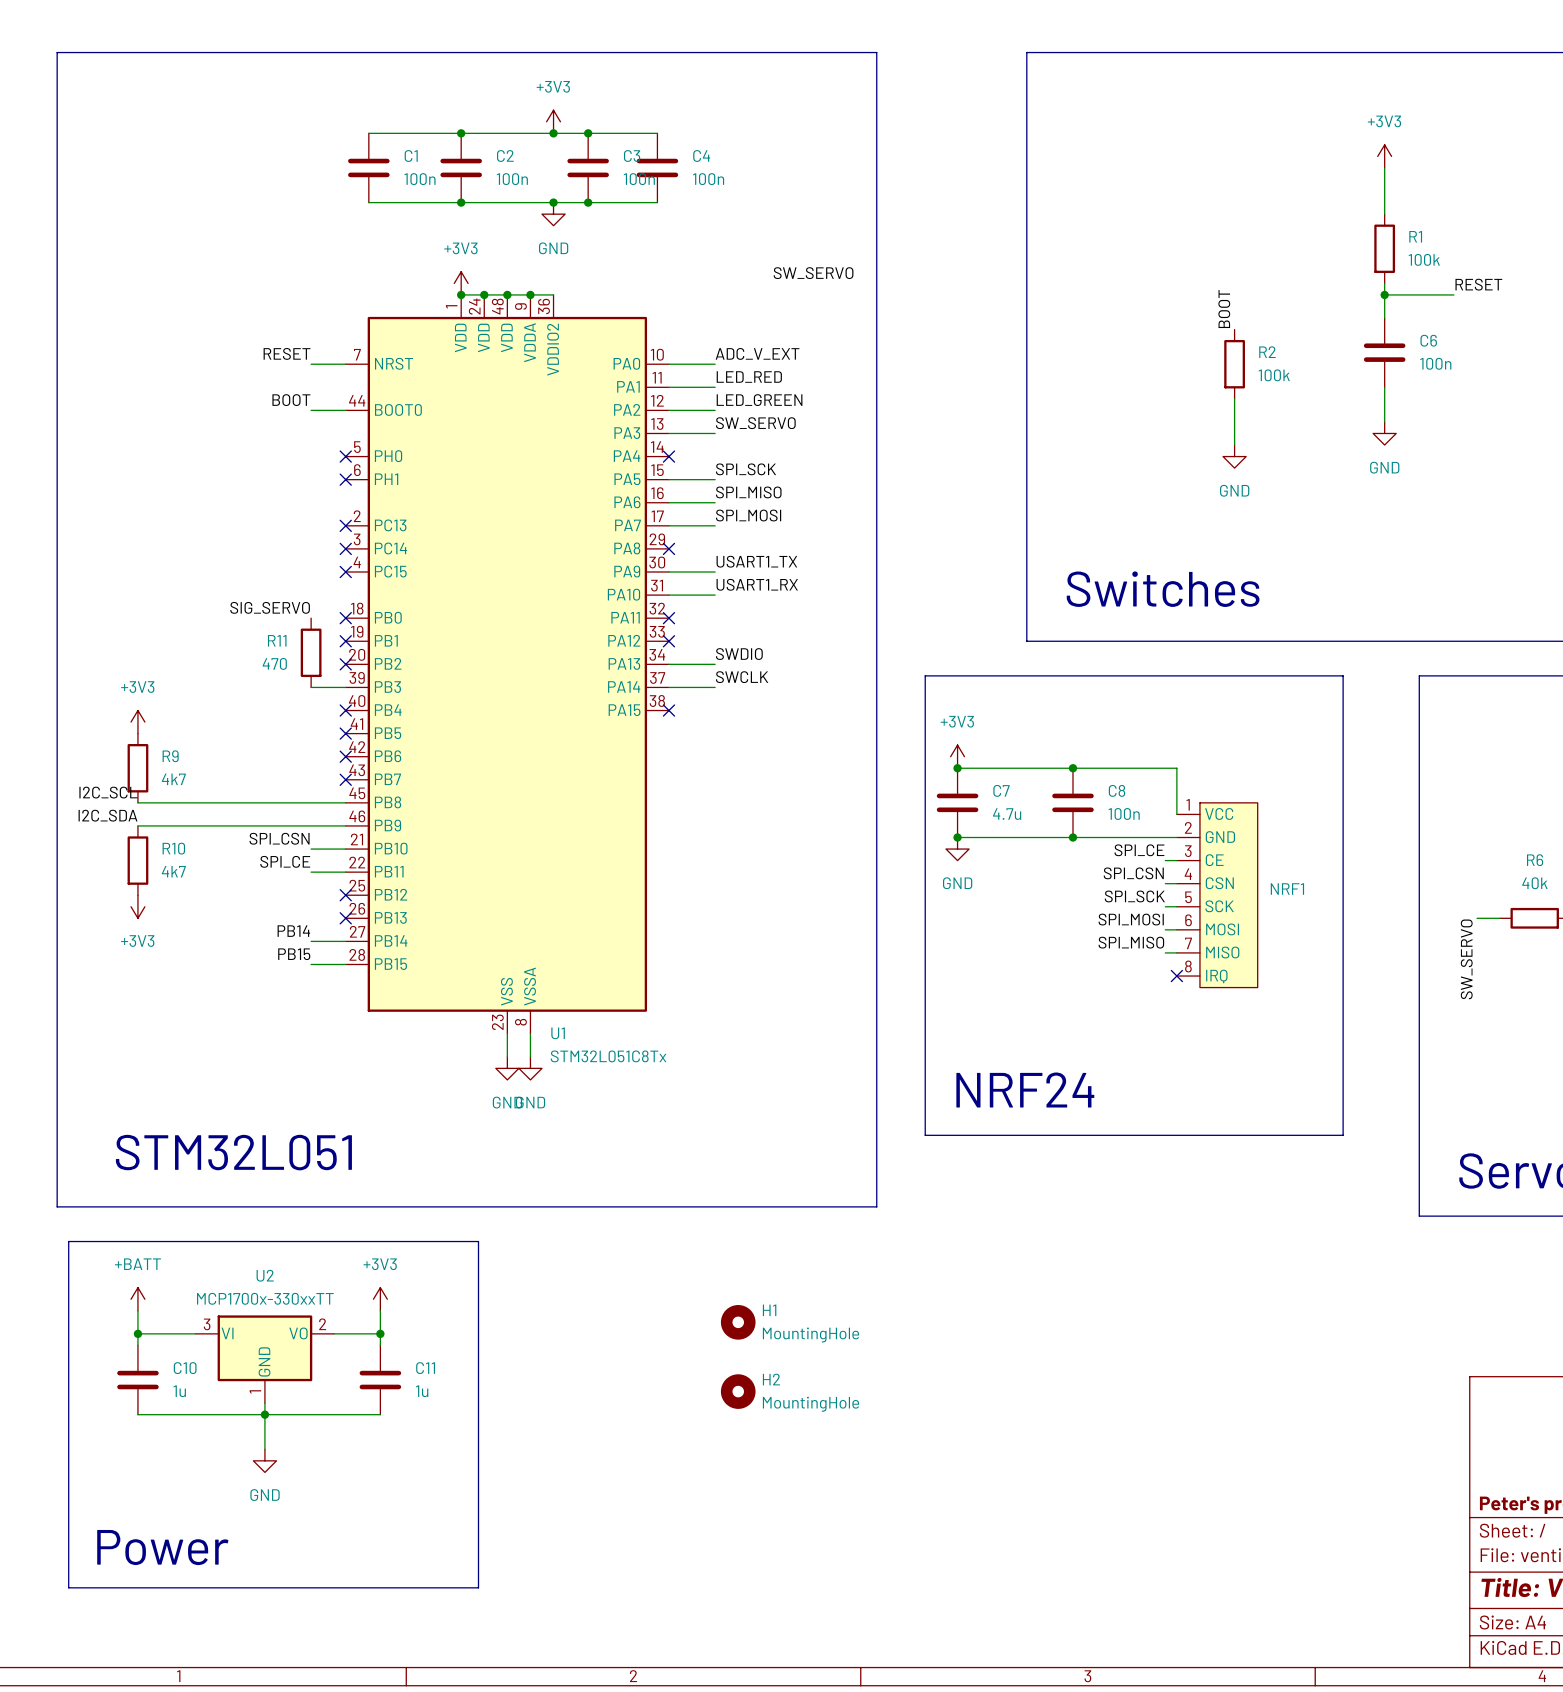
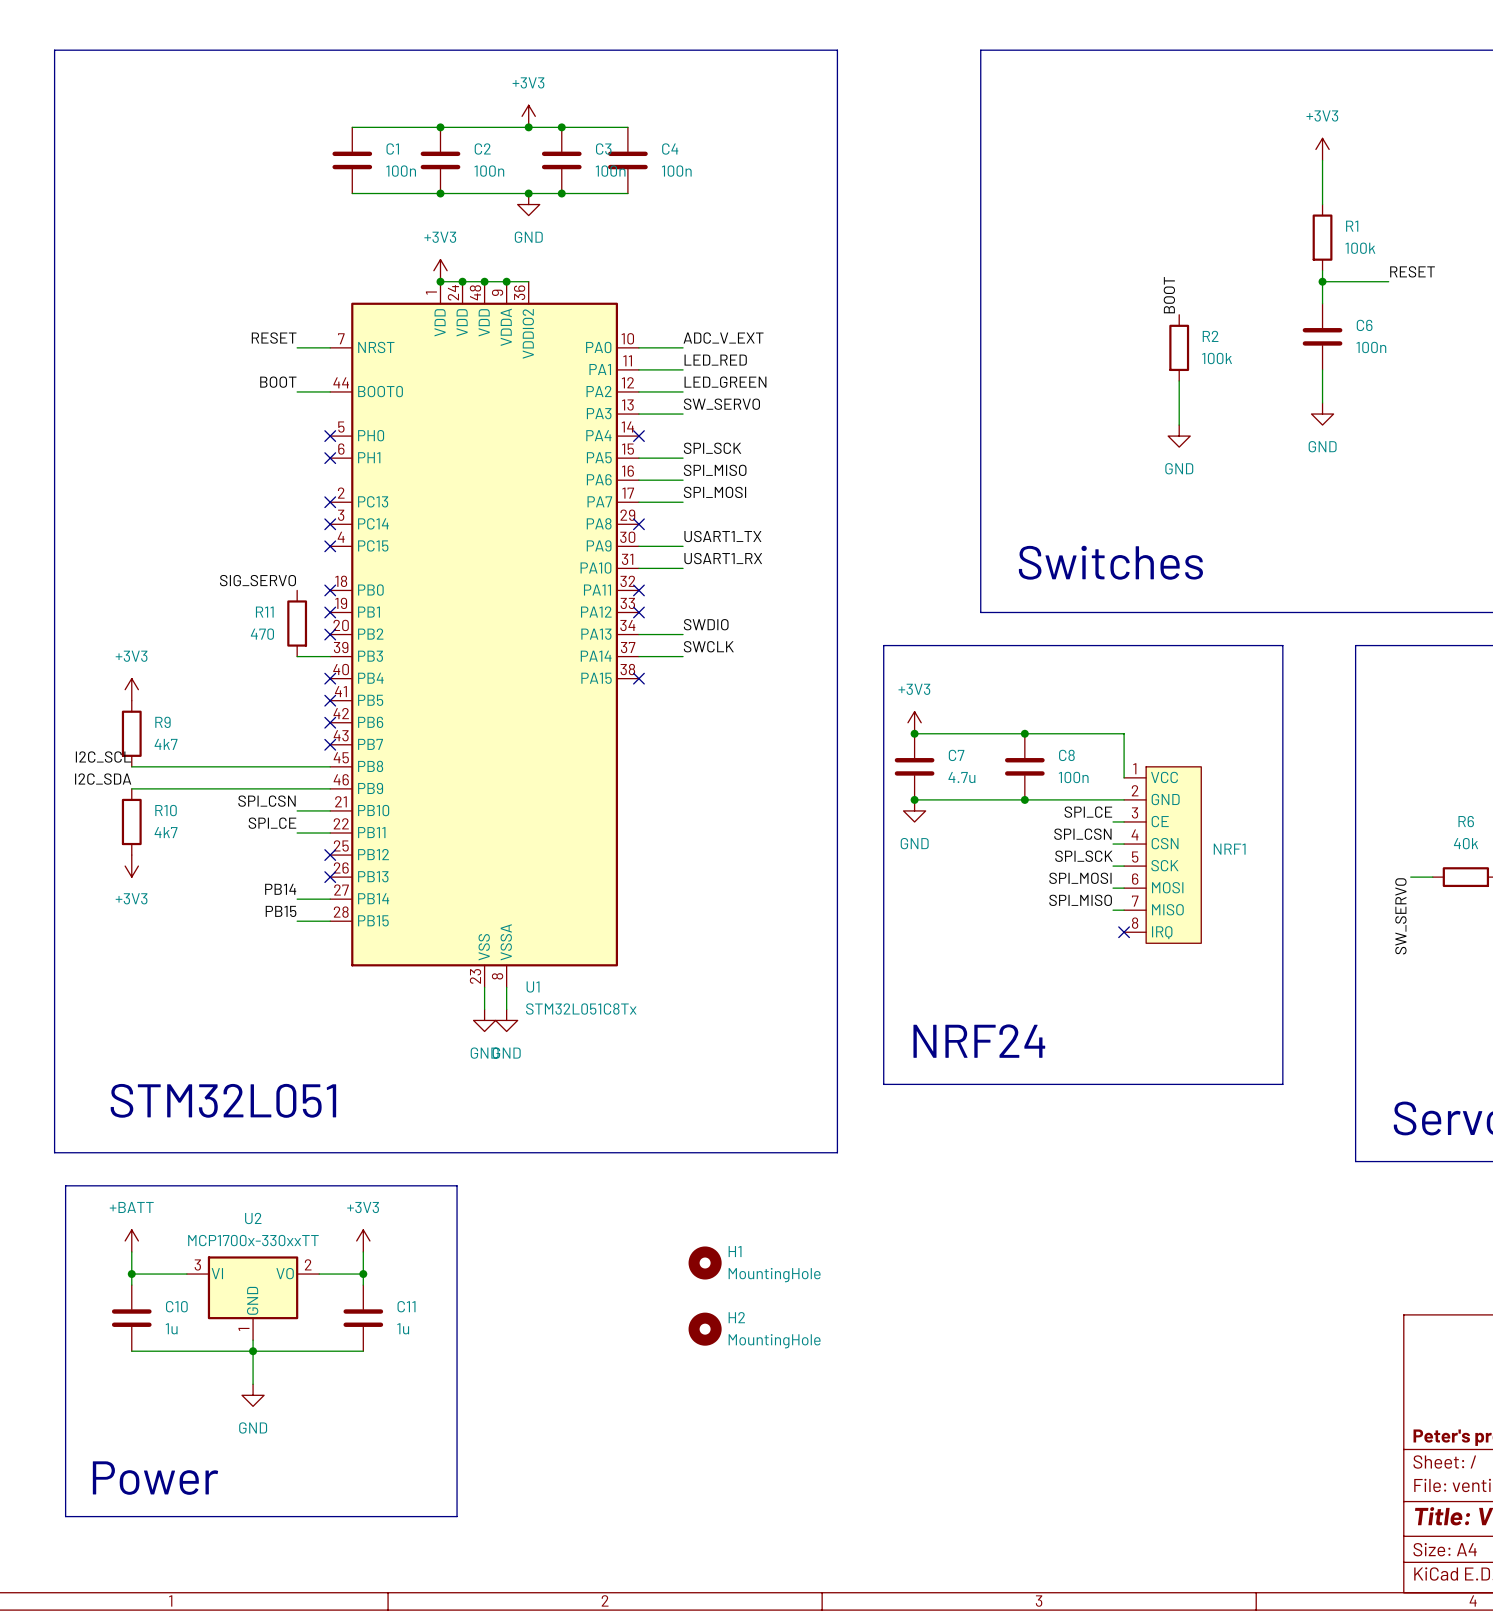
label: SW_SERVO (813, 273) -> none

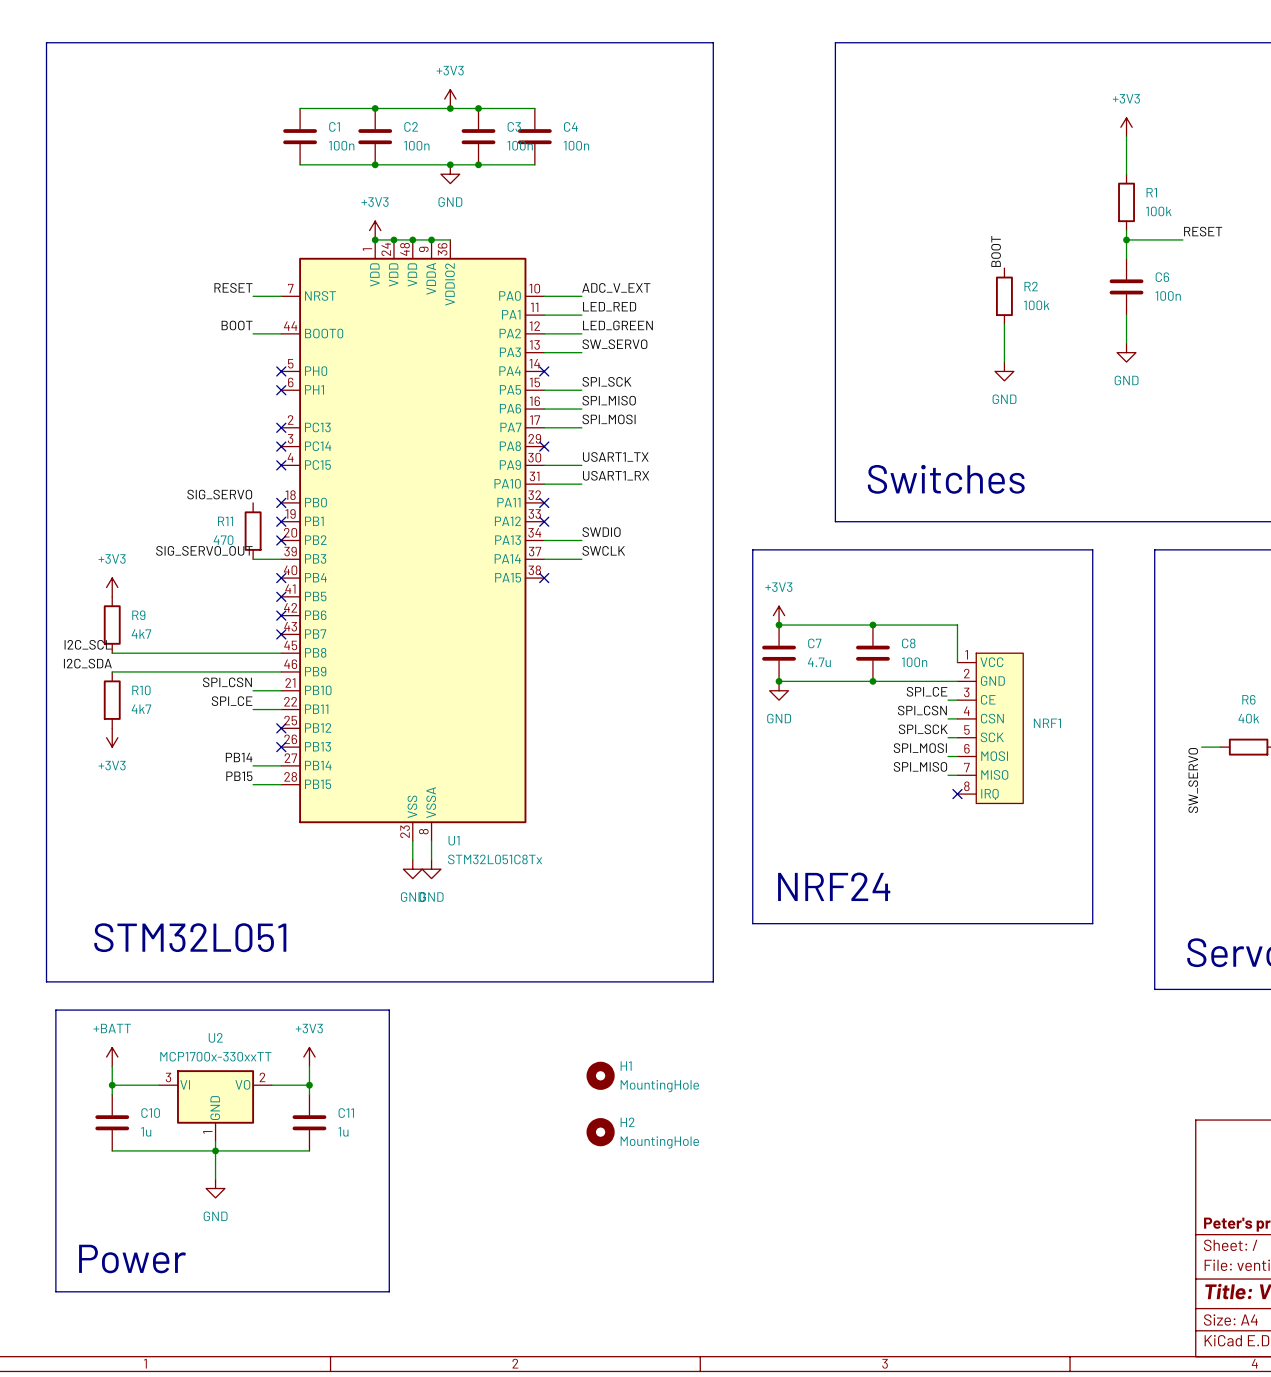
label: none -> SIG_SERVO_OUT (204, 550)

